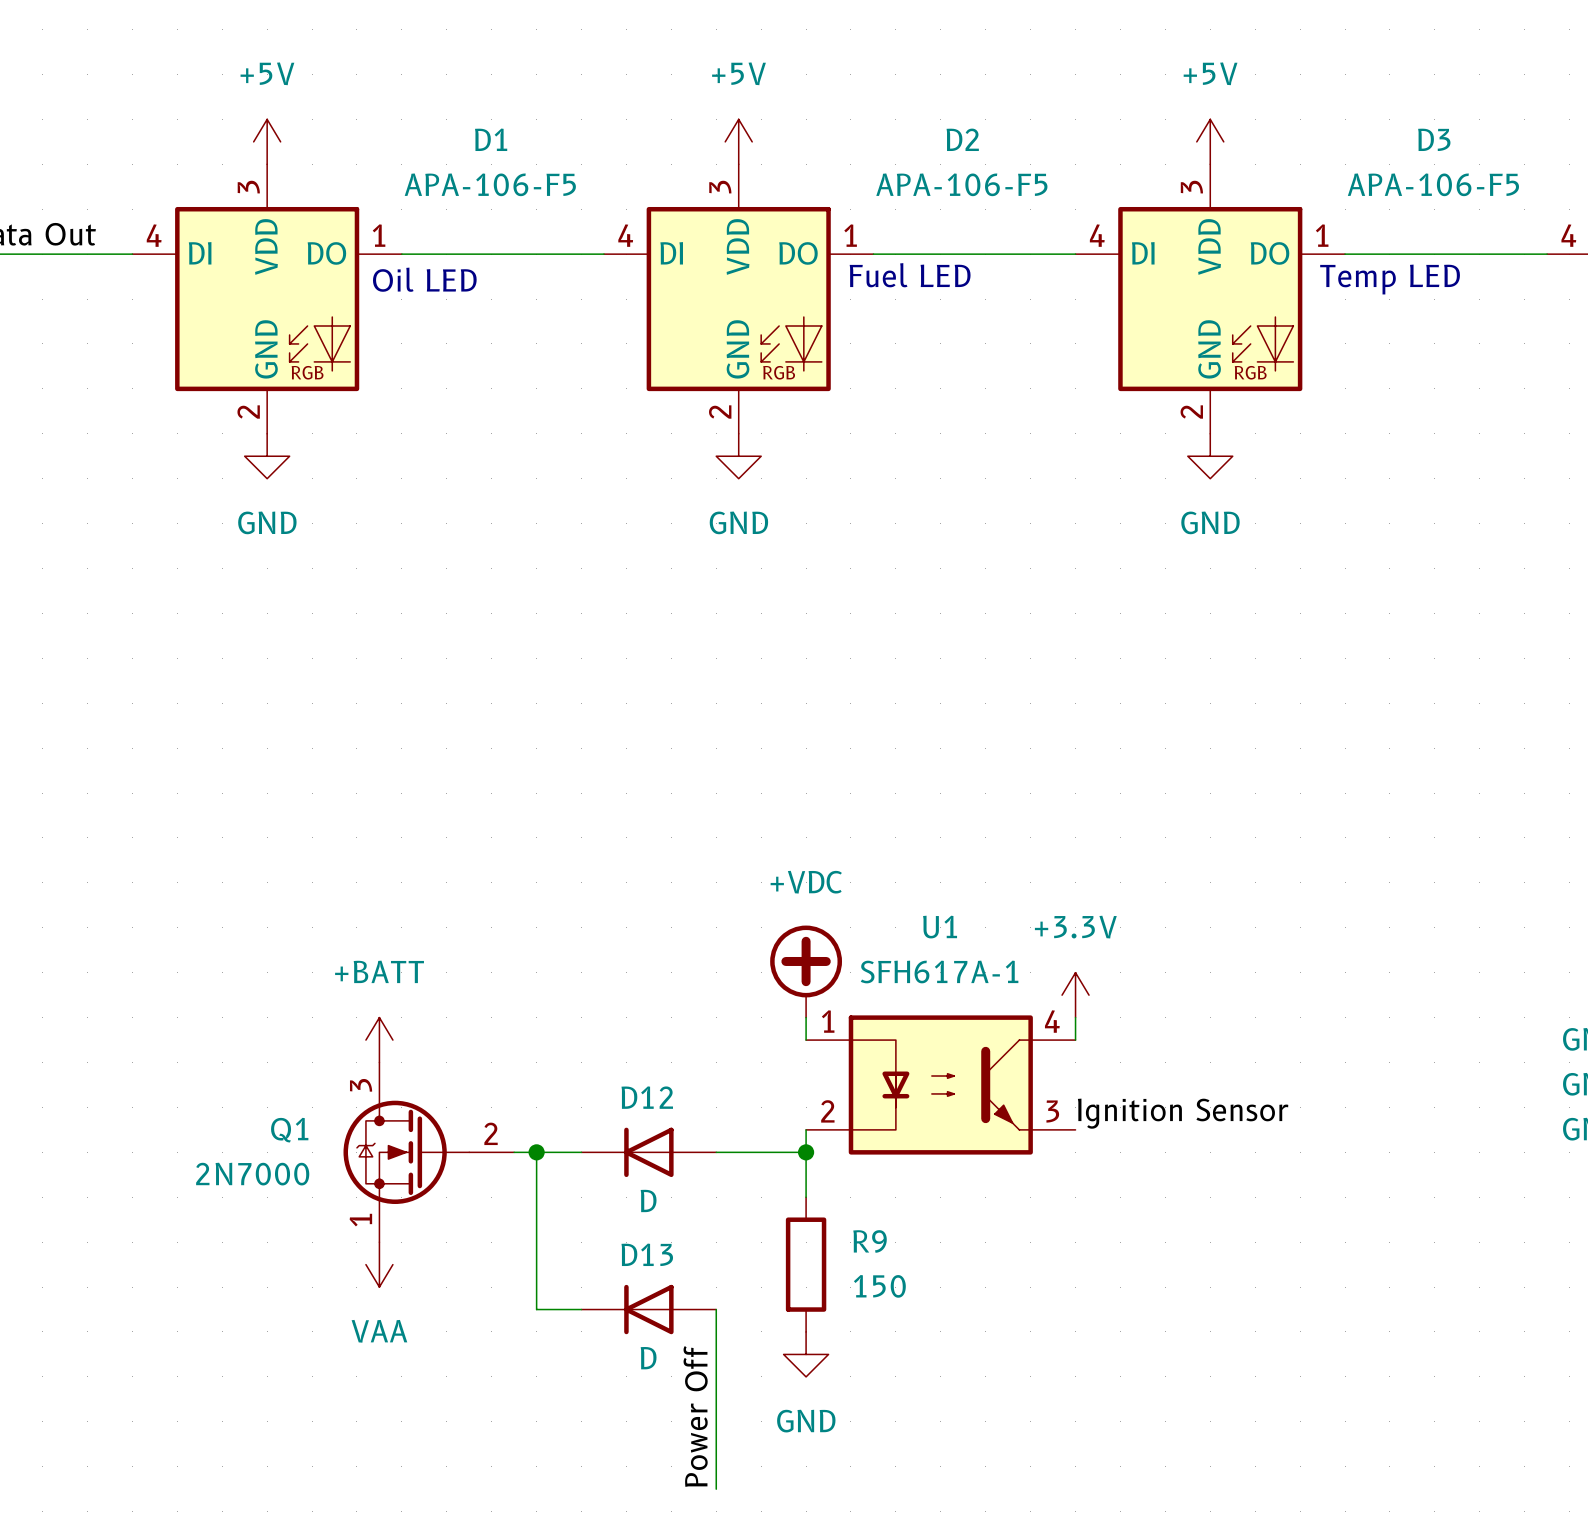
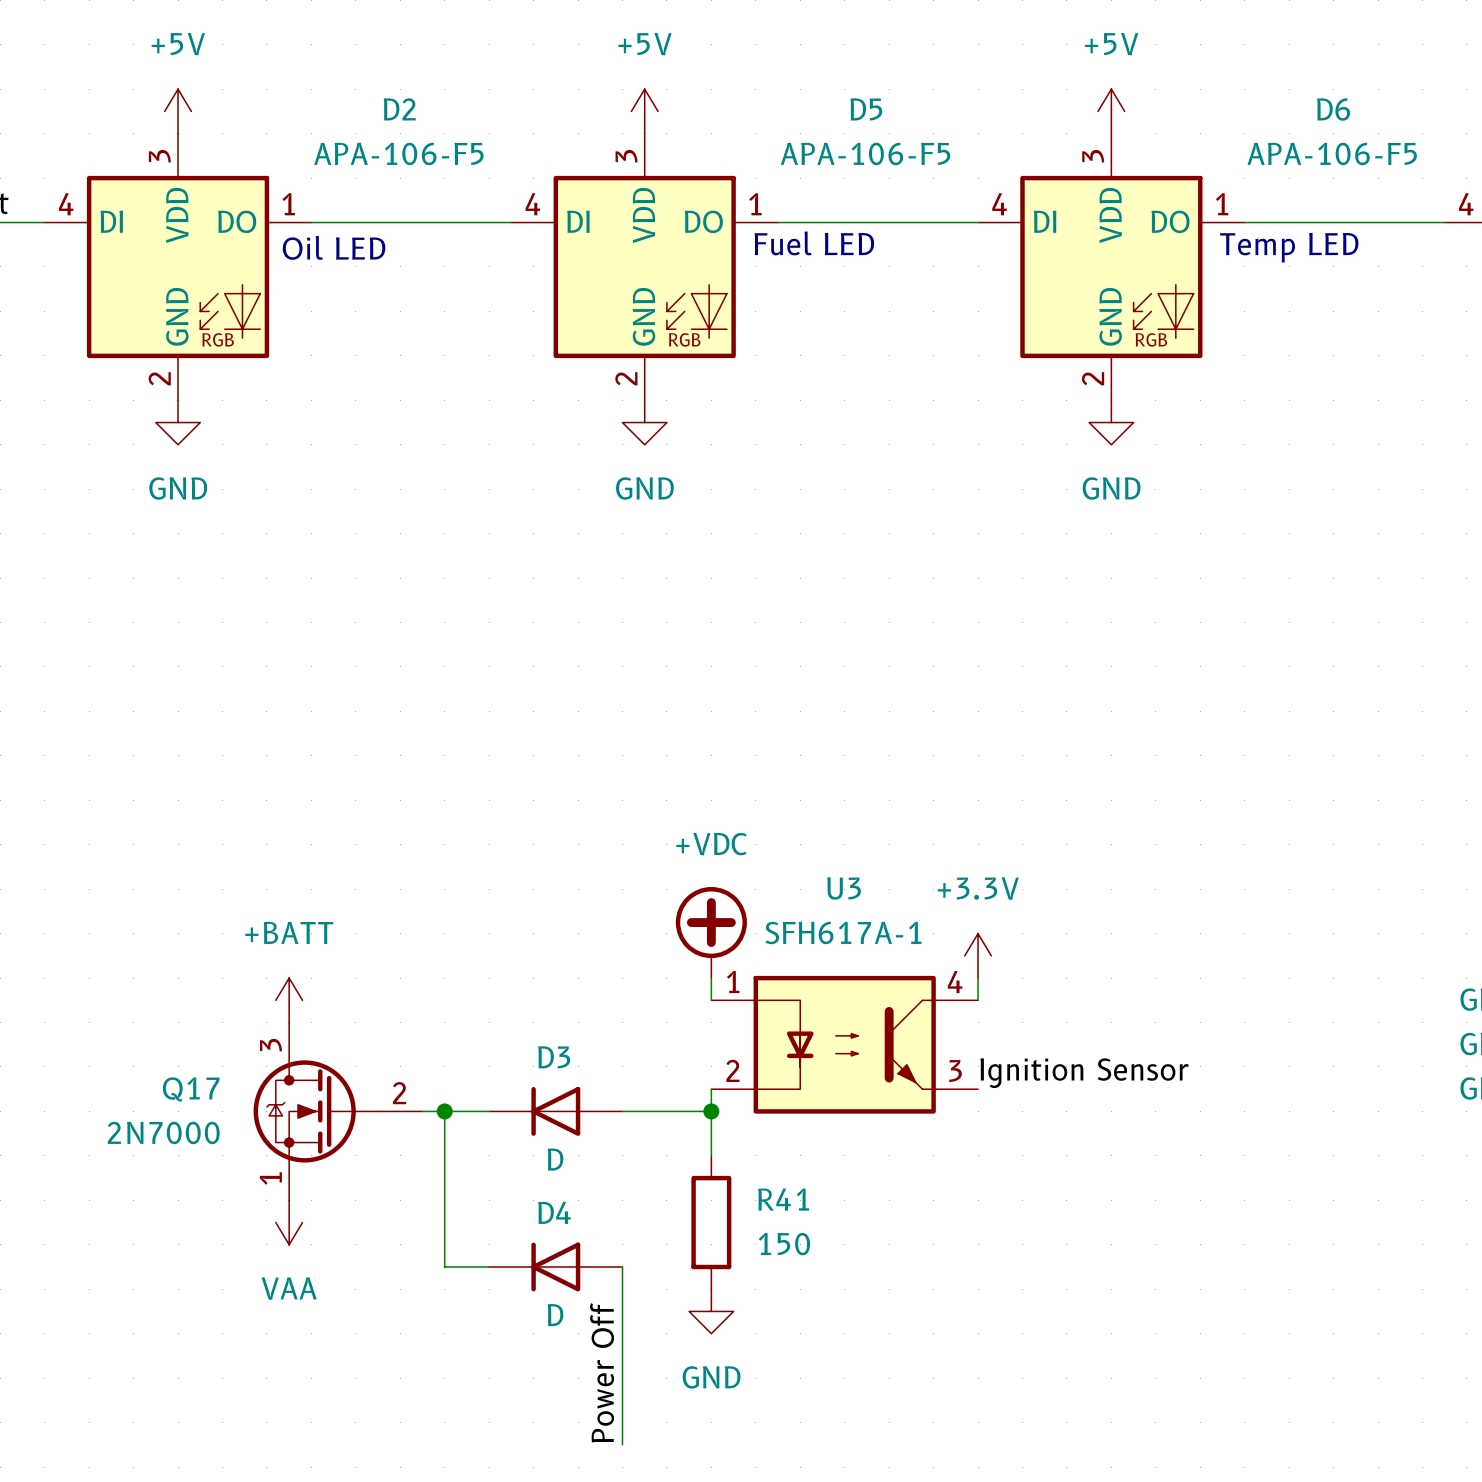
D1 name: D1 (491, 139) -> D2 (399, 109)
D2 name: D2 (962, 139) -> D5 (866, 109)
D3 name: D3 (1434, 139) -> D6 (1333, 109)
U1 name: U1 (940, 927) -> U3 (844, 888)
D12 name: D12 (647, 1097) -> D3 (554, 1057)
Q1 name: Q1 (289, 1130) -> Q17 (191, 1089)
R9 name: R9 (870, 1241) -> R41 (783, 1199)
D13 name: D13 (647, 1254) -> D4 (554, 1212)

